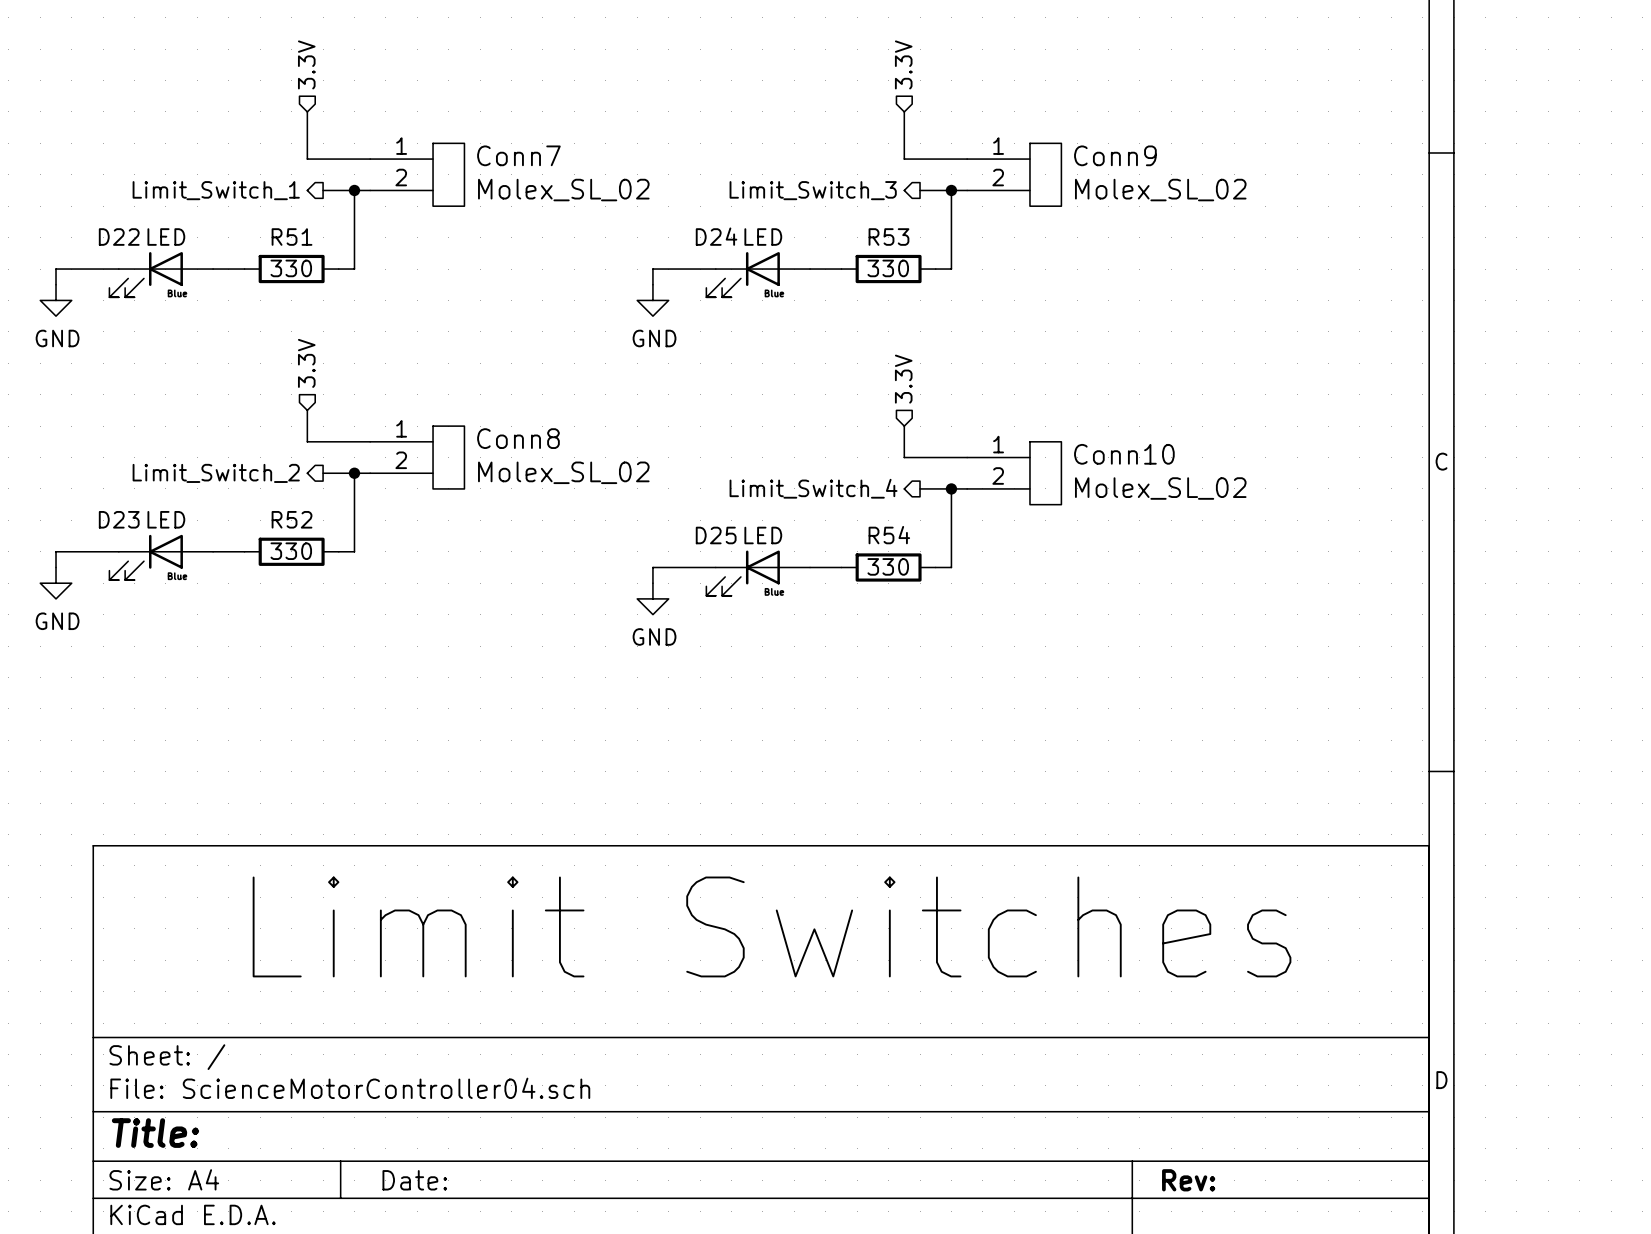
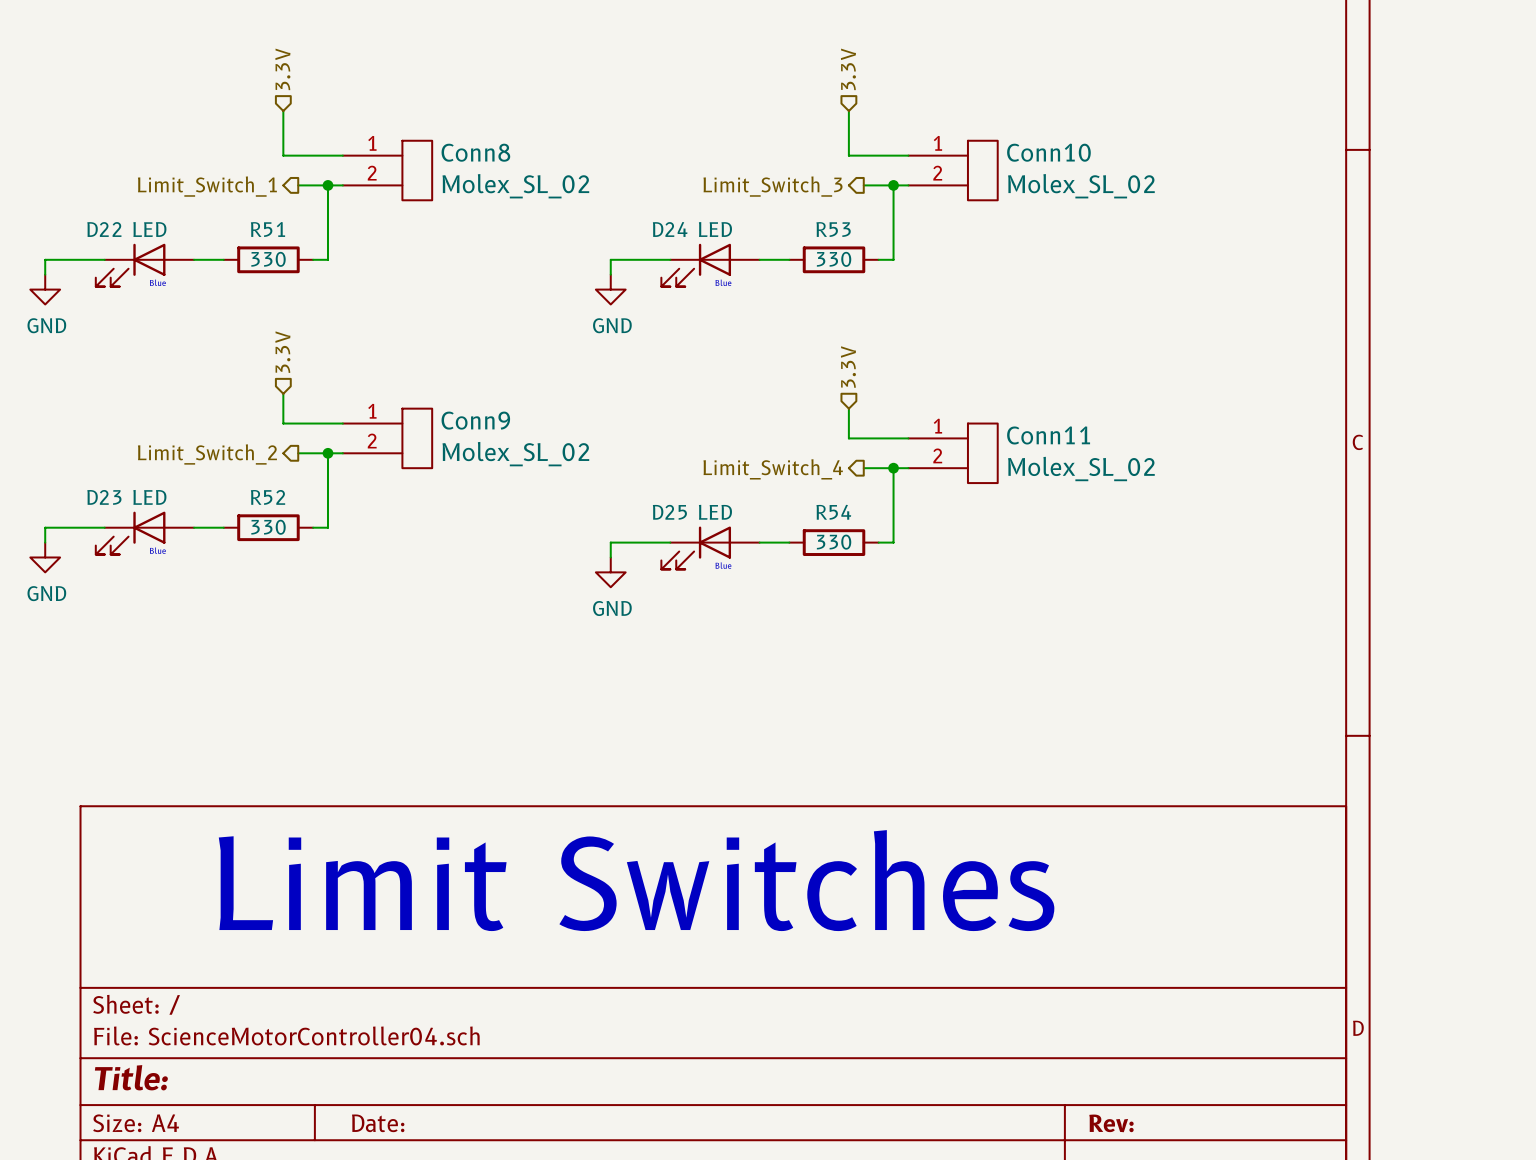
Conn7 name: Conn7 (518, 155) -> Conn8 (475, 152)
Conn9 name: Conn9 (1115, 155) -> Conn10 (1048, 152)
Conn8 name: Conn8 (518, 438) -> Conn9 (475, 420)
Conn10 name: Conn10 (1124, 454) -> Conn11 (1048, 435)

